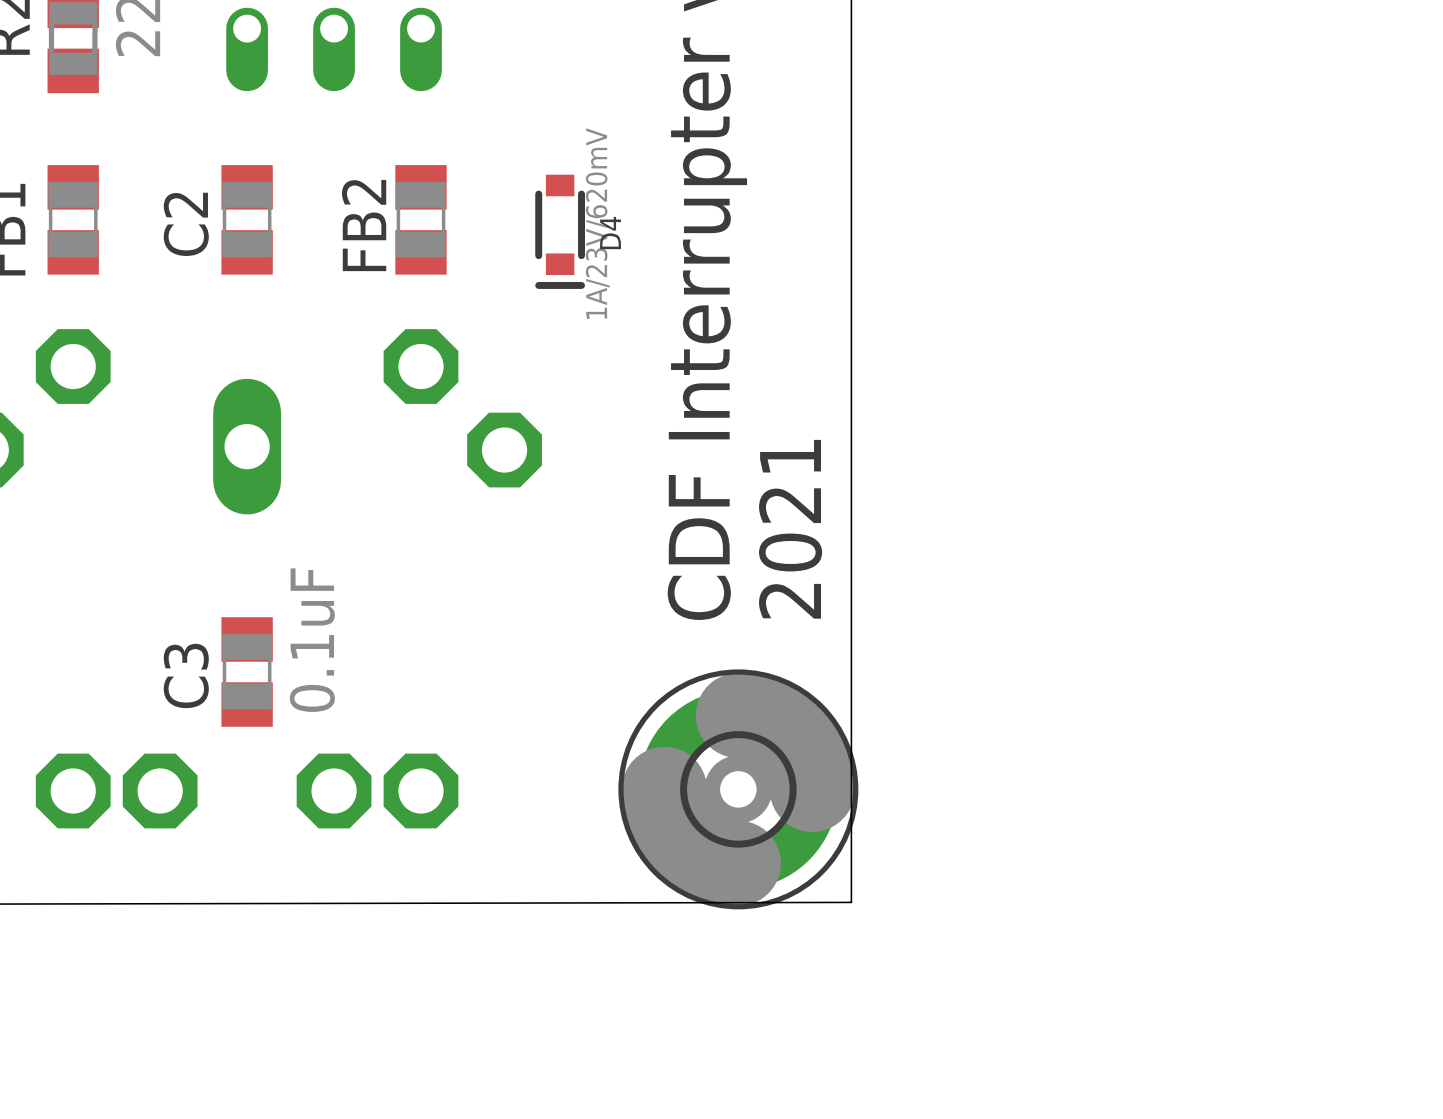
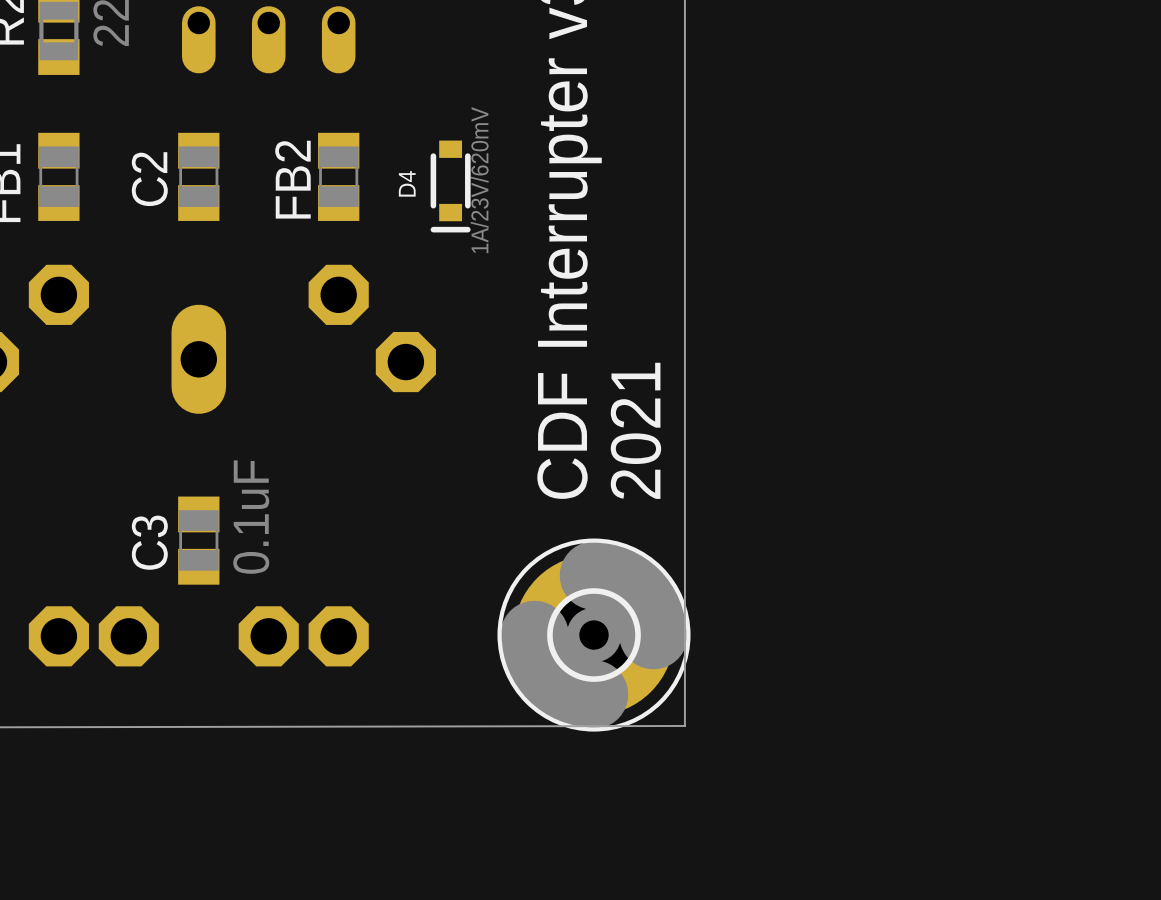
D4 name position: D4 (610, 233) -> D4 (407, 183)

